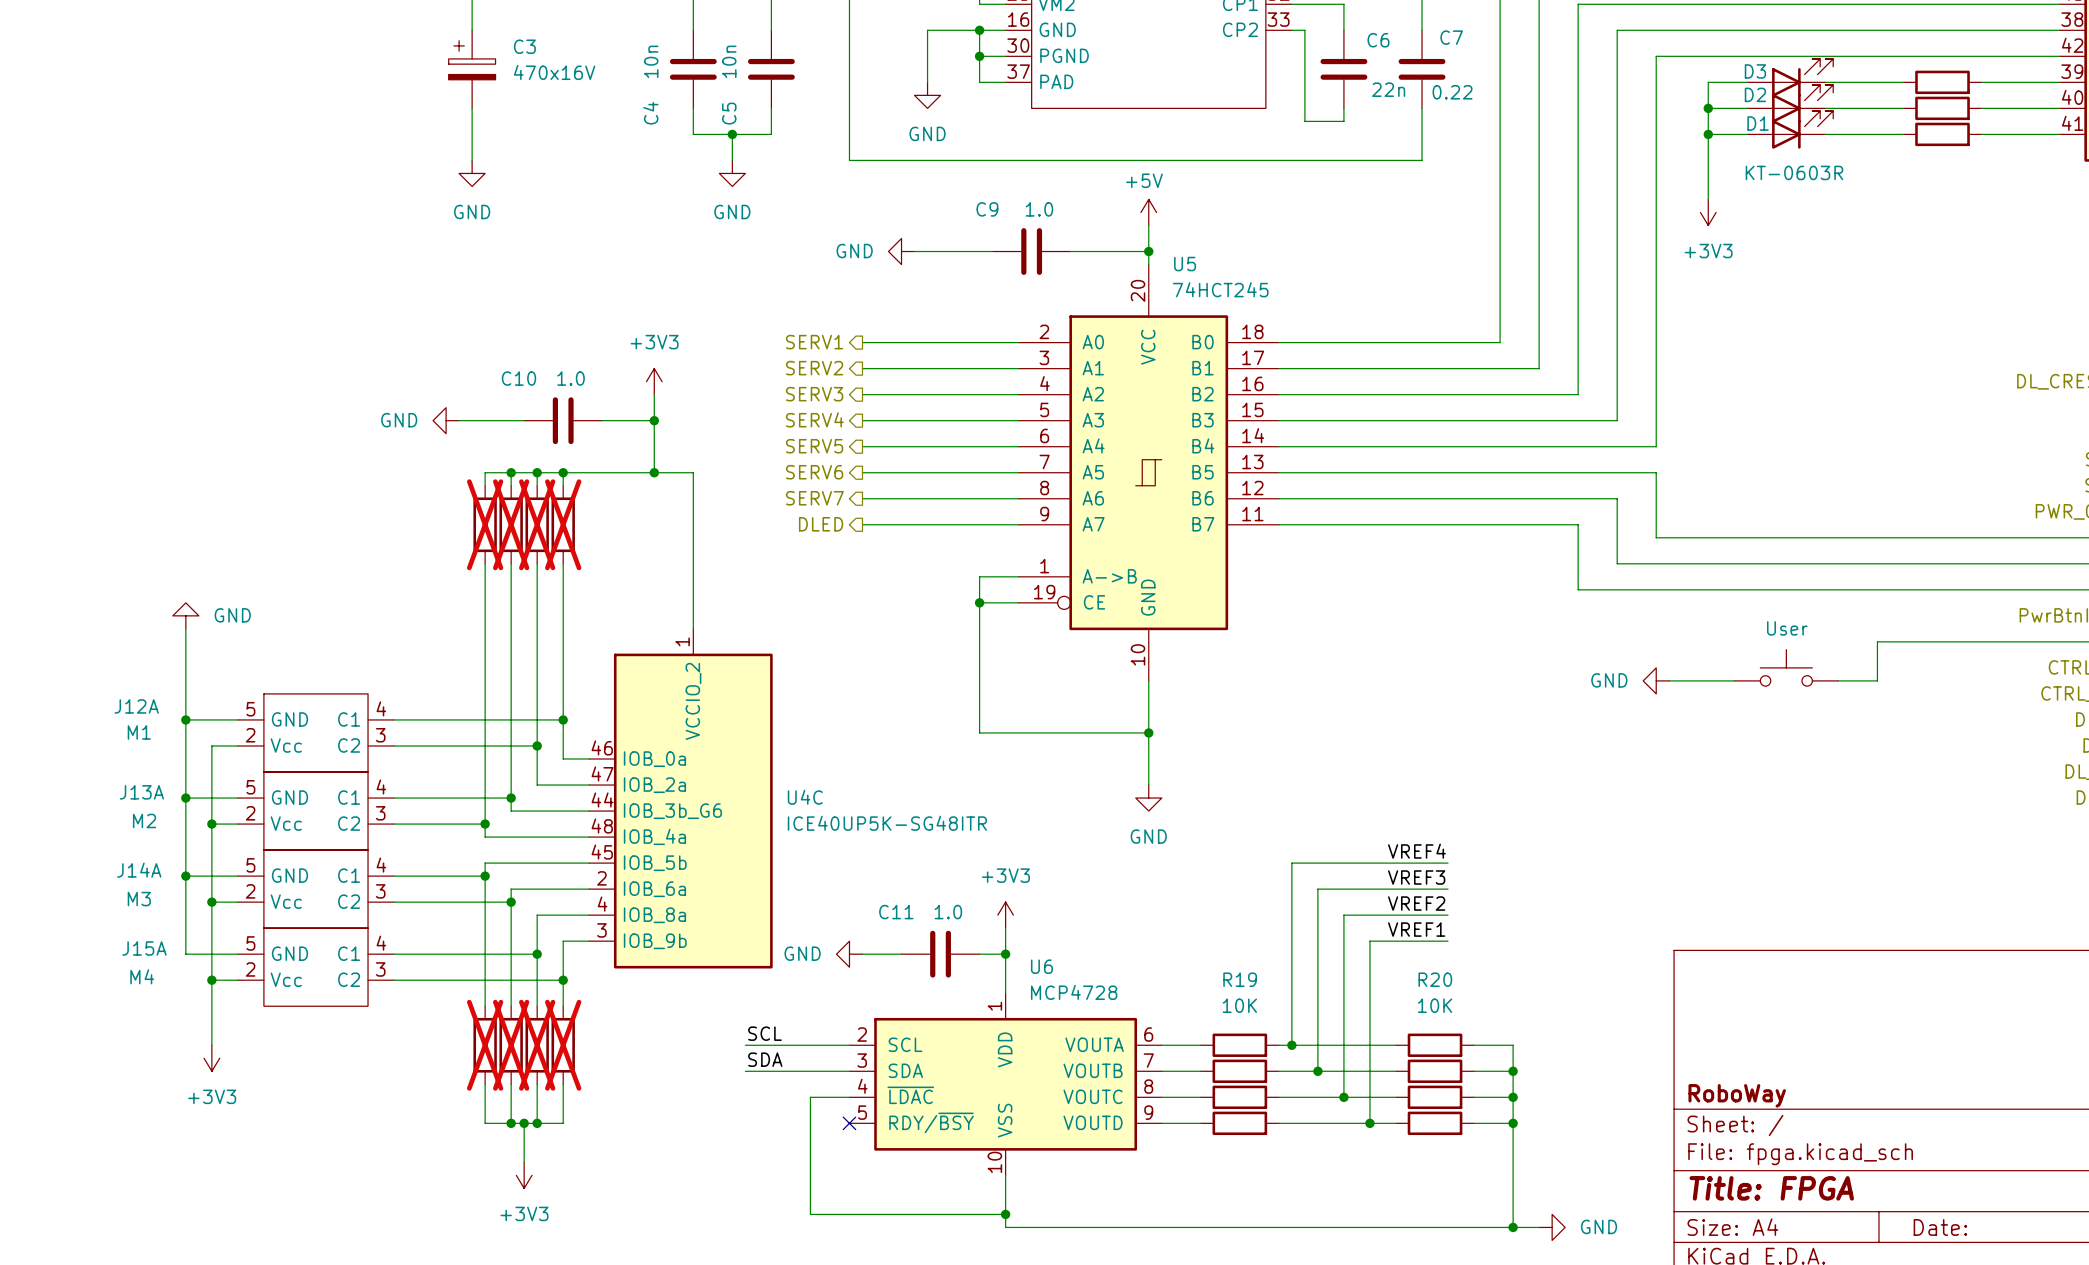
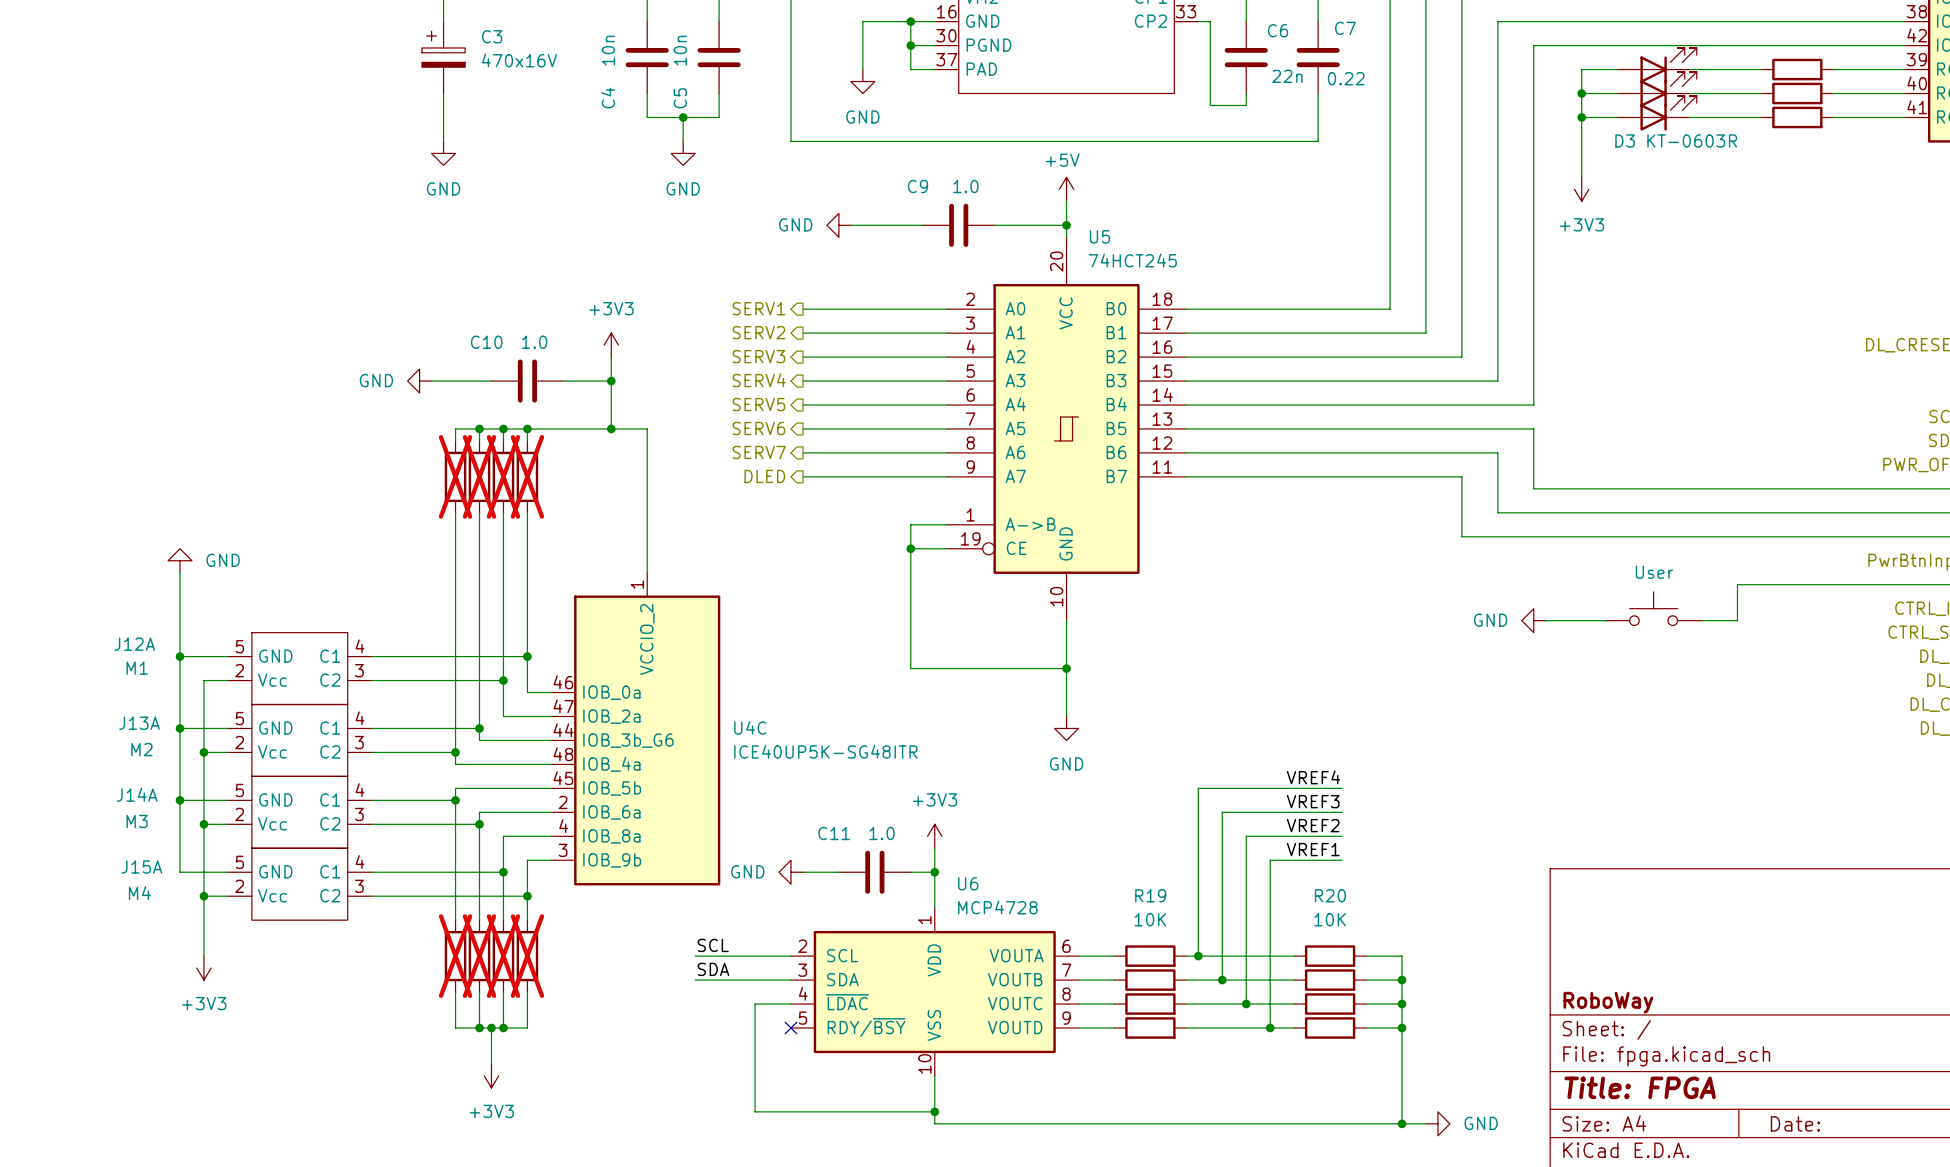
D3 name: D3 (1755, 71) -> none
D2 name: D2 (1755, 94) -> none
D1 name: D1 (1758, 123) -> D3 (1625, 140)
D1 value position: KT-0603R (1794, 172) -> KT-0603R (1692, 140)

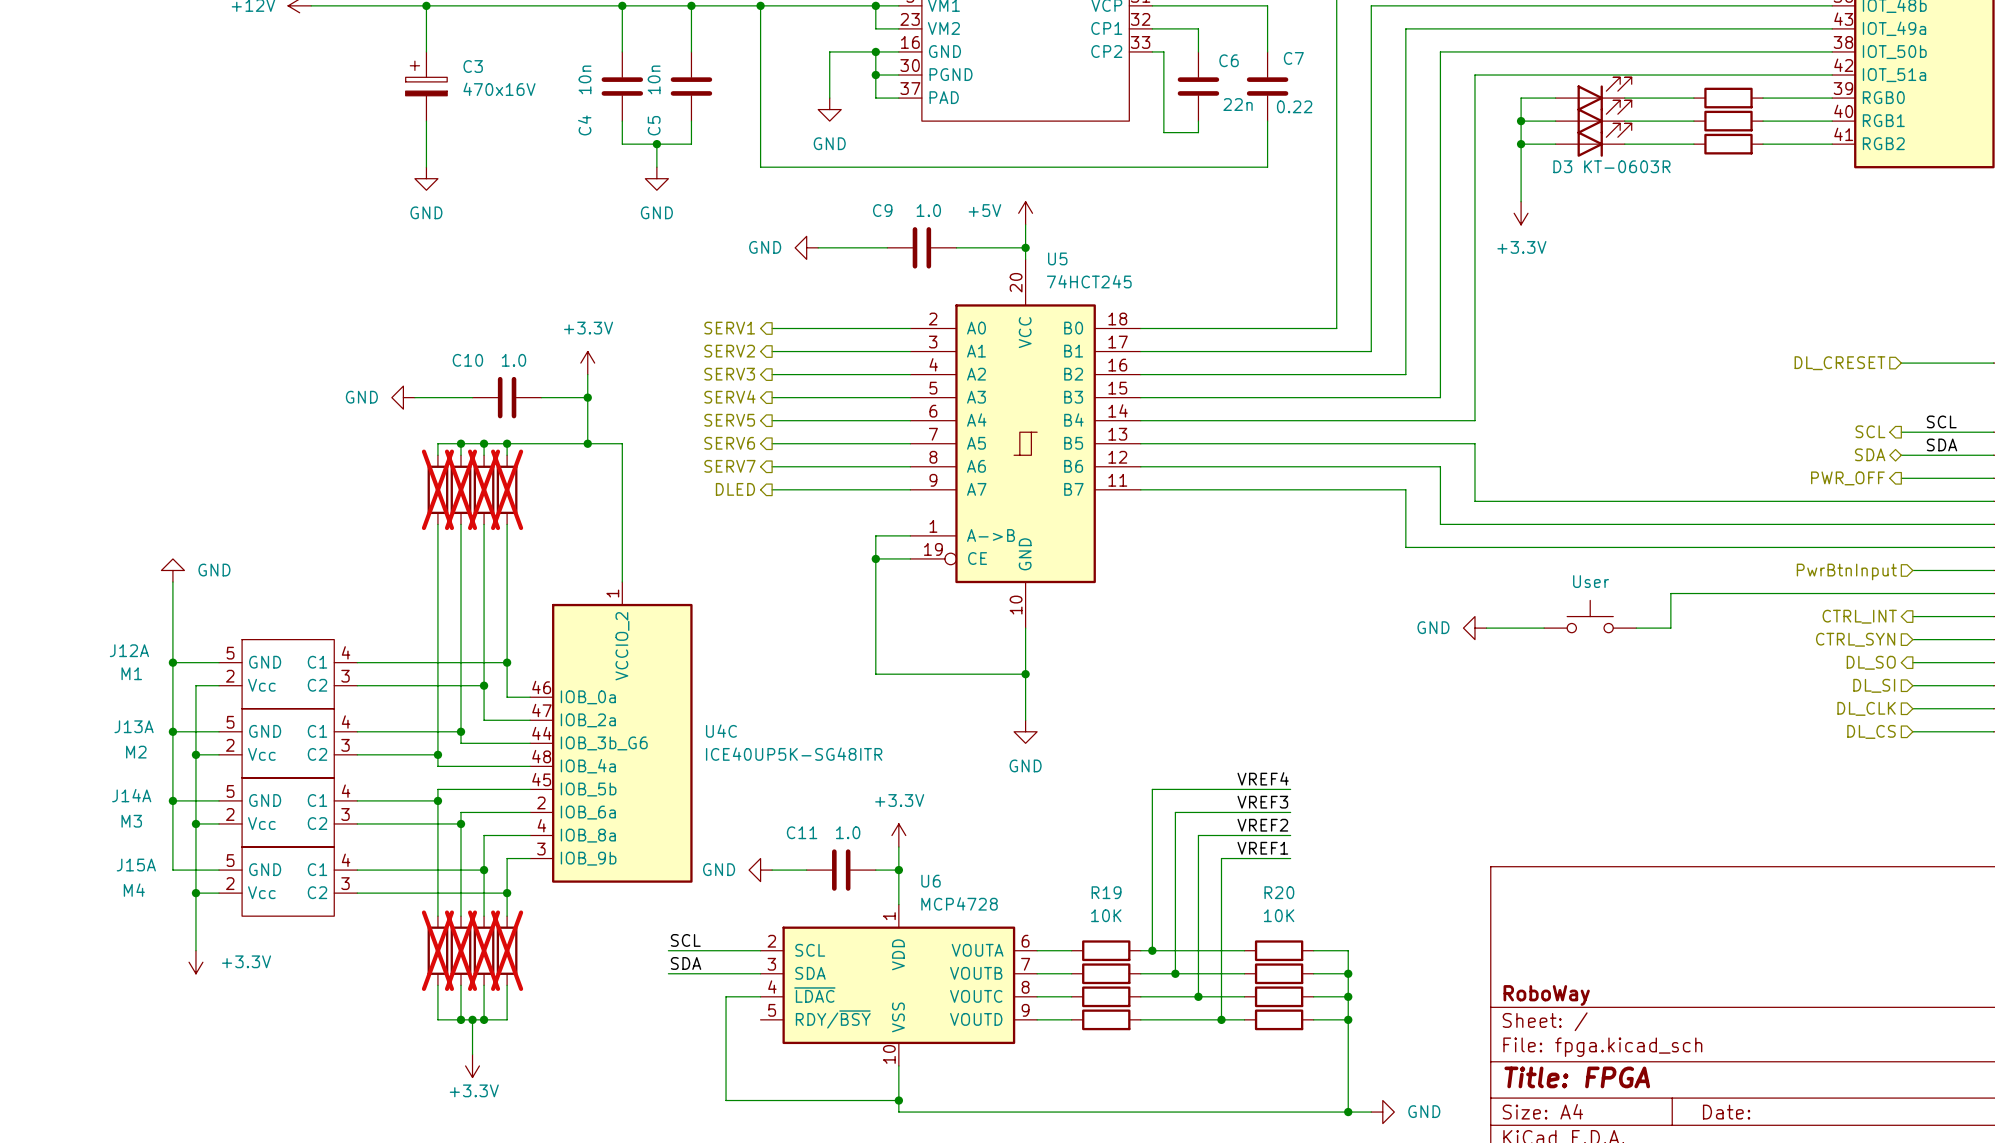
power symbol text position: +5V (1062, 160) -> +5V (984, 210)
power symbol: +3V3 (1581, 189) -> +3.3V (1521, 213)
power symbol: +3V3 (611, 345) -> +3.3V (587, 363)
power symbol: +3V3 (934, 836) -> +3.3V (898, 835)
power symbol: +3V3 (203, 968) -> +3.3V (195, 962)
no-connect mark: (790, 1027) -> none
power symbol: +3V3 (491, 1075) -> +3.3V (472, 1065)

